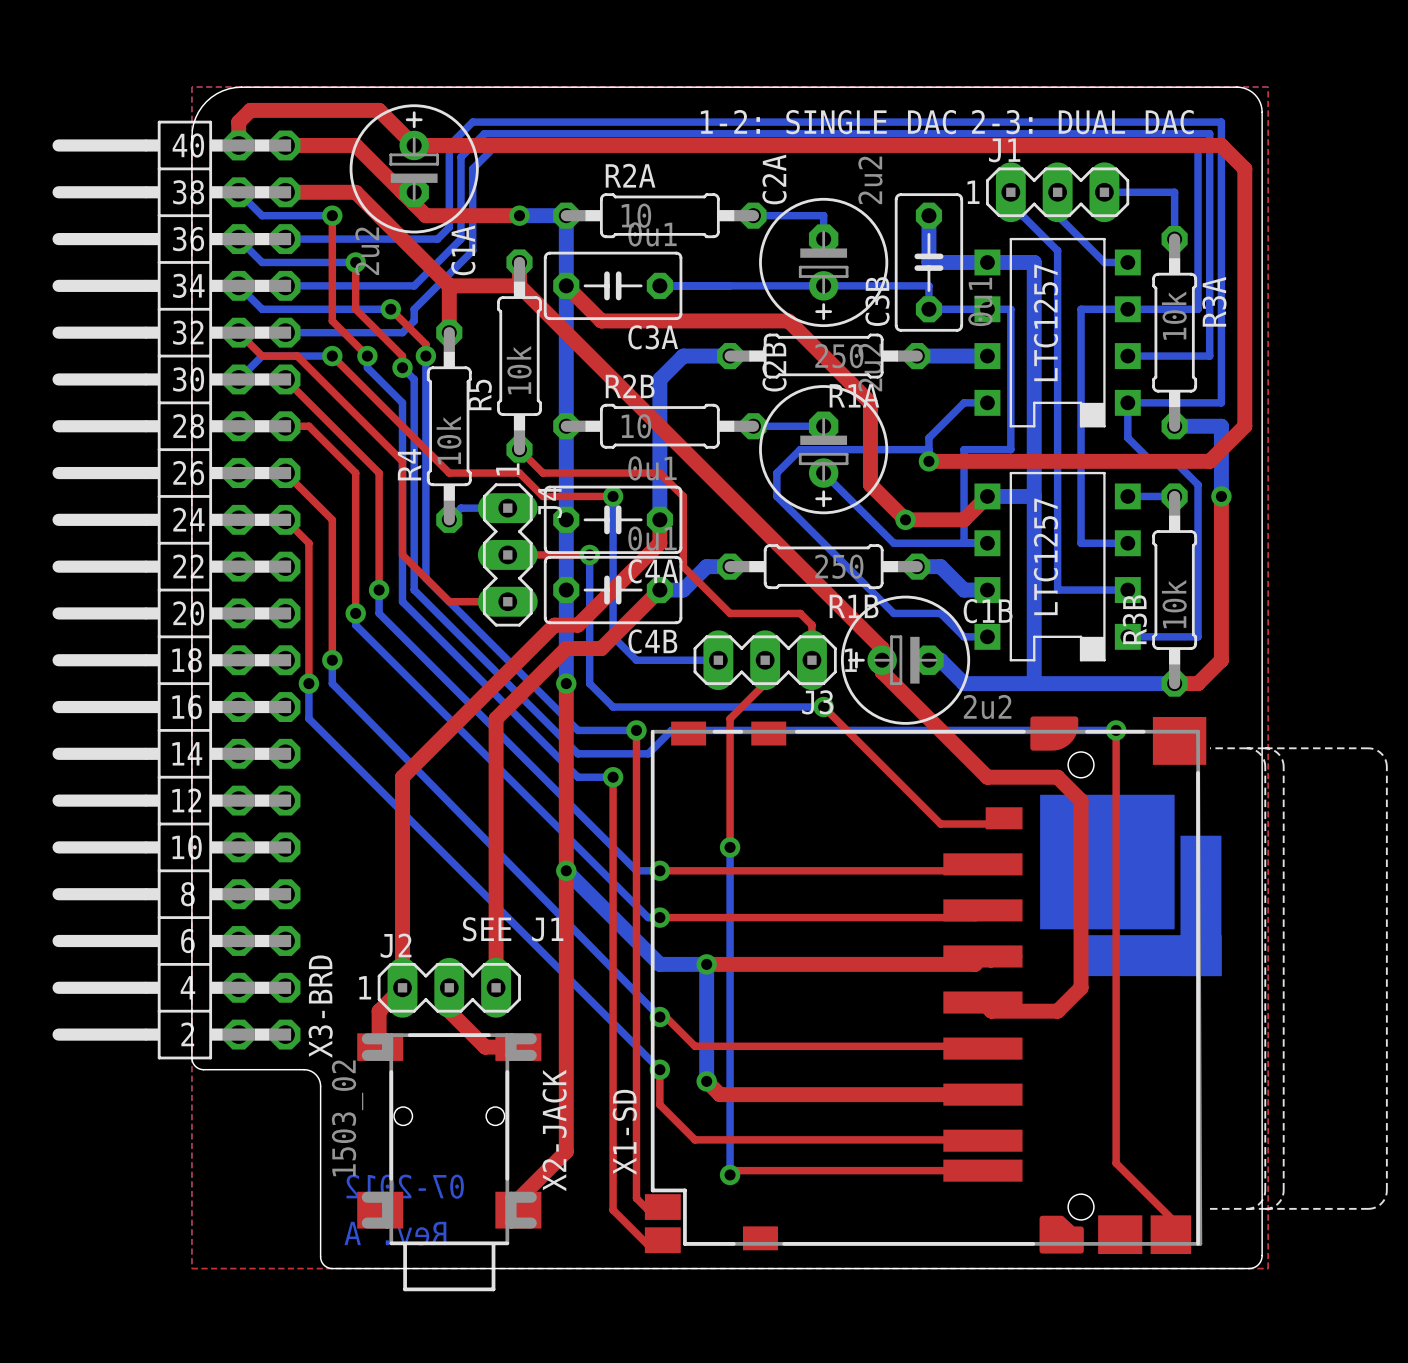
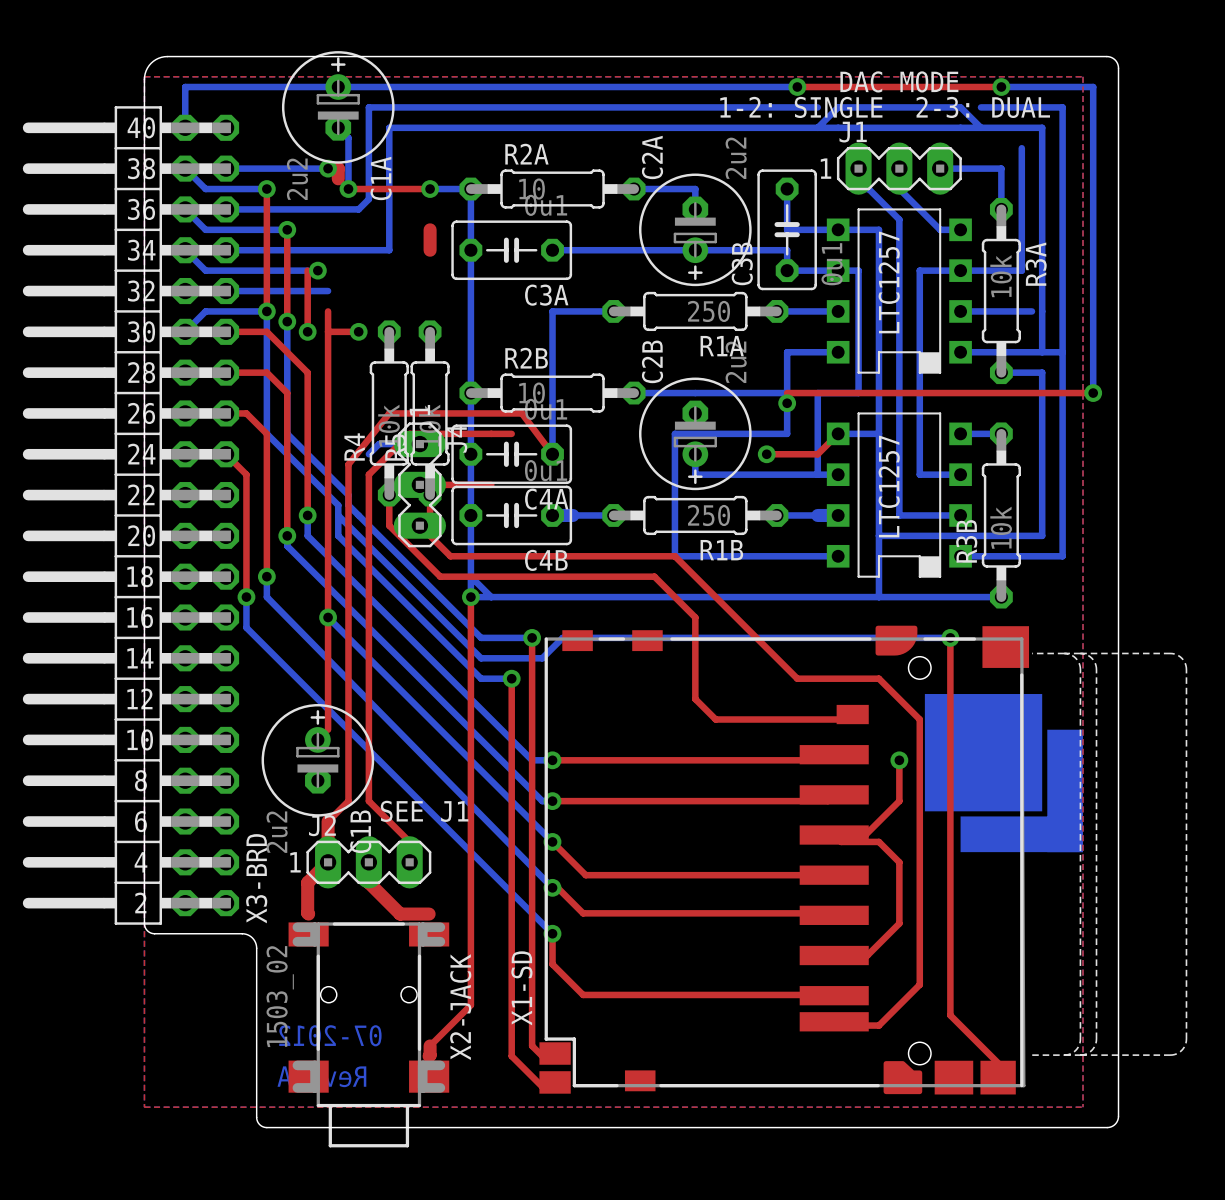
text: none -> DAC MODE (899, 81)
bottom track: none -> (797, 87) (185, 87) (185, 127)
top track: none -> (797, 87) (1001, 87)
via: none -> (797, 87)
bottom track: none -> (1001, 87) (1093, 87) (1093, 393)
via: none -> (1001, 87)
bottom track: (472, 122) (449, 145) -> (389, 107) (368, 107) (368, 127)
text: 1-2: SINGLE DAC (828, 122) -> 1-2: SINGLE (801, 107)
bottom track: (964, 122) (987, 122) -> (817, 127) (838, 107)
text: 2-3: DUAL DAC (1082, 122) -> 2-3: DUAL (983, 107)
bottom track: (1127, 122) (1151, 122) -> (960, 107) (980, 127)
bottom track: (1221, 122) (1221, 145) -> none
board edge: (191, 136) (195, 117) (206, 101) (222, 90) (241, 87) (1237, 87) (1252, 92) (1258, 99) (1261, 108) (1262, 1255) (1259, 1263) (1249, 1268) (332, 1268) (324, 1265) (320, 1256) -> (144, 120) (146, 70) (155, 59) (167, 56) (1106, 56) (1115, 59) (1118, 66) (1118, 1116) (1116, 1123) (1107, 1127) (266, 1127) (260, 1125) (257, 1120) (256, 1096)
top track: (238, 145) (238, 122) (250, 110) (379, 110) (414, 145) (1221, 145) (1244, 168) (1244, 426) (1209, 461) (928, 461) -> none
top track: (285, 145) (355, 145) (425, 215) -> none
bottom track: none -> (338, 127) (348, 138) (348, 189)
bottom track: (496, 145) (472, 168) -> (409, 127) (389, 127) (389, 148)
bottom track: (1198, 145) (1198, 168) -> (1021, 127) (1042, 127)
C1A position: (414, 168) -> (338, 107)
bottom track: none -> (226, 168) (328, 168)
top track: (285, 192) (355, 192) (449, 285) -> none
via: none -> (328, 168)
top track width: thick (425, 215) (519, 215) -> thin (348, 189) (430, 189)
via: none -> (348, 189)
bottom track width: thick (519, 215) (566, 215) (566, 683) -> thin (430, 189) (470, 189) (470, 597)
bottom track width: thick (928, 215) (928, 262) (1034, 262) (1034, 683) -> thin (787, 189) (787, 229) (878, 229) (878, 597)
bottom track: (472, 250) (414, 309) (414, 320) (402, 332) -> (389, 219) (389, 250) (338, 250)
bottom track: (414, 285) (461, 239) (461, 157) (484, 133) (1209, 133) (1209, 356) -> none
top track: (449, 285) (519, 285) (882, 648) (882, 671) (987, 777) -> (430, 495) (430, 535) (450, 556) (674, 556) (797, 678) (838, 678)
top track: (449, 285) (449, 332) -> none
top track: (566, 285) (601, 320) (788, 320) (870, 402) (870, 484) (905, 519) -> none
top track: (355, 309) (402, 356) -> (287, 270) (287, 321)
top track: none -> (307, 270) (307, 331)
top track: (390, 309) (425, 344) (425, 356) -> none
top track: (332, 320) (367, 356) -> (266, 280) (266, 311)
top track: (238, 332) (262, 356) (297, 356) (402, 461) -> (328, 321) (328, 403)
top track: (332, 356) (449, 473) (472, 473) -> none
bottom track: (367, 356) (367, 367) (402, 402) (402, 601) (414, 613) -> (338, 515) (338, 535)
via position: (367, 356) -> (287, 321)
bottom track: (425, 356) (425, 566) -> (287, 321) (287, 433) (348, 495)
via: (425, 356) -> none
R5 position: (519, 356) -> (430, 413)
bottom track: (683, 356) (659, 379) -> (572, 311) (552, 311) (552, 331)
bottom track width: thick (683, 356) (730, 356) -> thin (572, 311) (613, 311)
bottom track width: thick (917, 356) (987, 356) -> thin (776, 311) (838, 311)
bottom track: (402, 367) (414, 379) (414, 578) -> (266, 311) (266, 433) (338, 505)
via: (402, 367) -> none
top track: (285, 379) (332, 426) -> (246, 372) (266, 372)
top track: none -> (226, 331) (266, 331) (307, 372) (307, 413)
via: none -> (307, 331)
top track: none -> (328, 331) (358, 331)
via: none -> (358, 331)
bottom track width: thick (659, 379) (659, 519) -> thin (552, 331) (552, 454)
bottom track: (964, 402) (928, 437) -> (817, 352) (787, 352) (787, 382)
bottom track: (1127, 402) (1127, 437) (1151, 461) (1174, 461) (1198, 484) (1198, 636) -> (1042, 107) (1062, 107) (1062, 556) (1021, 556)
bottom track: none -> (1042, 352) (1062, 352)
top track: (308, 426) (355, 473) -> none
R4 position: (449, 426) -> (389, 413)
R2B position: (659, 426) -> (552, 393)
bottom track: (753, 426) (823, 426) -> none
bottom track width: thick (1174, 426) (1221, 426) (1221, 496) -> thin (1001, 372) (1042, 372) (1042, 433)
top track: (355, 449) (379, 473) -> (287, 393) (287, 413)
top track: (519, 449) (542, 473) -> (430, 413) (450, 413)
bottom track: none -> (634, 393) (674, 393)
bottom track: (800, 449) (776, 473) (776, 496) (893, 613) (940, 613) (964, 636) -> (787, 403) (787, 433) (674, 433) (674, 556) (817, 556)
C2B position: (823, 449) -> (695, 433)
top track: none -> (787, 393) (1093, 393)
top track: (285, 473) (332, 519) -> (226, 413) (246, 413) (266, 433) (266, 454)
top track: (519, 473) (542, 496) -> none
top track: (624, 473) (659, 473) (683, 496) (683, 566) (730, 613) (800, 613) (811, 625) (811, 660) -> (521, 413) (552, 454)
bottom track: (823, 473) (893, 543) -> (695, 454) (695, 474) (756, 474)
bottom track: (613, 496) (613, 636) (636, 660) (718, 660) -> none
via: (613, 496) -> none
bottom track width: thick (987, 496) (1034, 496) -> thin (838, 433) (878, 433)
top track width: thick (987, 496) (964, 519) (905, 519) -> thin (838, 433) (817, 454) (766, 454)
bottom track: none -> (1042, 433) (1042, 535) (878, 535)
top track: (1221, 496) (1221, 660) (1198, 683) (1174, 683) -> none
via position: (1221, 496) -> (1093, 393)
top track: (659, 519) (659, 543) (577, 625) (554, 625) (402, 777) -> none
top track: (402, 554) (449, 601) (507, 601) -> (328, 484) (328, 678)
bottom track: (589, 554) (589, 683) (613, 707) (823, 707) -> none
via: (589, 554) -> none
bottom track: (730, 566) (706, 566) (683, 590) -> (613, 515) (572, 515)
R1B position: (823, 566) -> (695, 515)
bottom track: (917, 566) (940, 566) (964, 590) -> (776, 515) (817, 515)
top track: (659, 590) (601, 648) (566, 648) (496, 718) (496, 964) -> (450, 433) (409, 433) (368, 474) (368, 801) (409, 841)
bottom track: none -> (470, 576) (491, 597)
top track: (765, 660) (765, 683) (730, 718) (730, 847) -> none
J3: (765, 660) -> none
C1B rotation: 0° (905, 660) -> 90° clockwise (317, 760)
C1B position: (905, 660) -> (317, 760)
bottom track: (928, 660) (940, 660) (964, 683) -> (470, 597) (817, 597)
top track width: thick (566, 683) (566, 1151) (519, 1198) -> thin (470, 597) (470, 1005) (430, 1045)
bottom track width: thick (964, 683) (1174, 683) -> thin (817, 597) (1001, 597)
bottom track: none -> (328, 617) (470, 760)
via: none -> (328, 617)
top track: (823, 707) (940, 824) -> (389, 495) (389, 525) (440, 576) (654, 576) (695, 617) (695, 699) (715, 719) (797, 719)
via: (823, 707) -> none
top track width: thick (402, 777) (402, 835) -> thin (328, 678) (328, 729)
top track width: thick (987, 777) (1034, 777) -> thin (838, 678) (878, 678)
top track: (1034, 777) (1057, 777) (1081, 800) (1081, 824) -> (878, 678) (919, 719)
top track width: thick (1081, 824) (1081, 987) -> thin (919, 719) (919, 862)
top track: (402, 835) (402, 941) -> (389, 413) (348, 464) (348, 801) (328, 821)
bottom track: (730, 847) (730, 1174) -> none
via: (730, 847) -> none
drawing position: (1107, 862) -> (983, 752)
bottom track width: thick (566, 870) (659, 964) -> thin (470, 760) (552, 841)
via: (566, 870) -> none
top track: none -> (899, 760) (899, 801) (865, 835)
via: none -> (899, 760)
drawing position: (1200, 905) -> (1065, 790)
drawing position: (1151, 955) -> (1021, 834)
top track: (982, 956) (975, 964) (706, 964) -> none
bottom track: (659, 964) (706, 964) (706, 1081) -> none
top track: none -> (552, 841) (585, 875) (834, 875)
via position: (706, 964) -> (552, 841)
top track: (1081, 987) (1057, 1011) (991, 1011) (982, 1002) -> (919, 862) (919, 984) (878, 1025) (838, 1025) (834, 1021)
top track: (706, 1081) (719, 1094) (982, 1094) -> (841, 841) (878, 841) (899, 862) (899, 923) (867, 955) (834, 955)
via: (706, 1081) -> none
X2-JACK position: (449, 1162) -> (368, 1034)
top track: (982, 1170) (734, 1170) (730, 1174) -> none
via: (730, 1174) -> none

